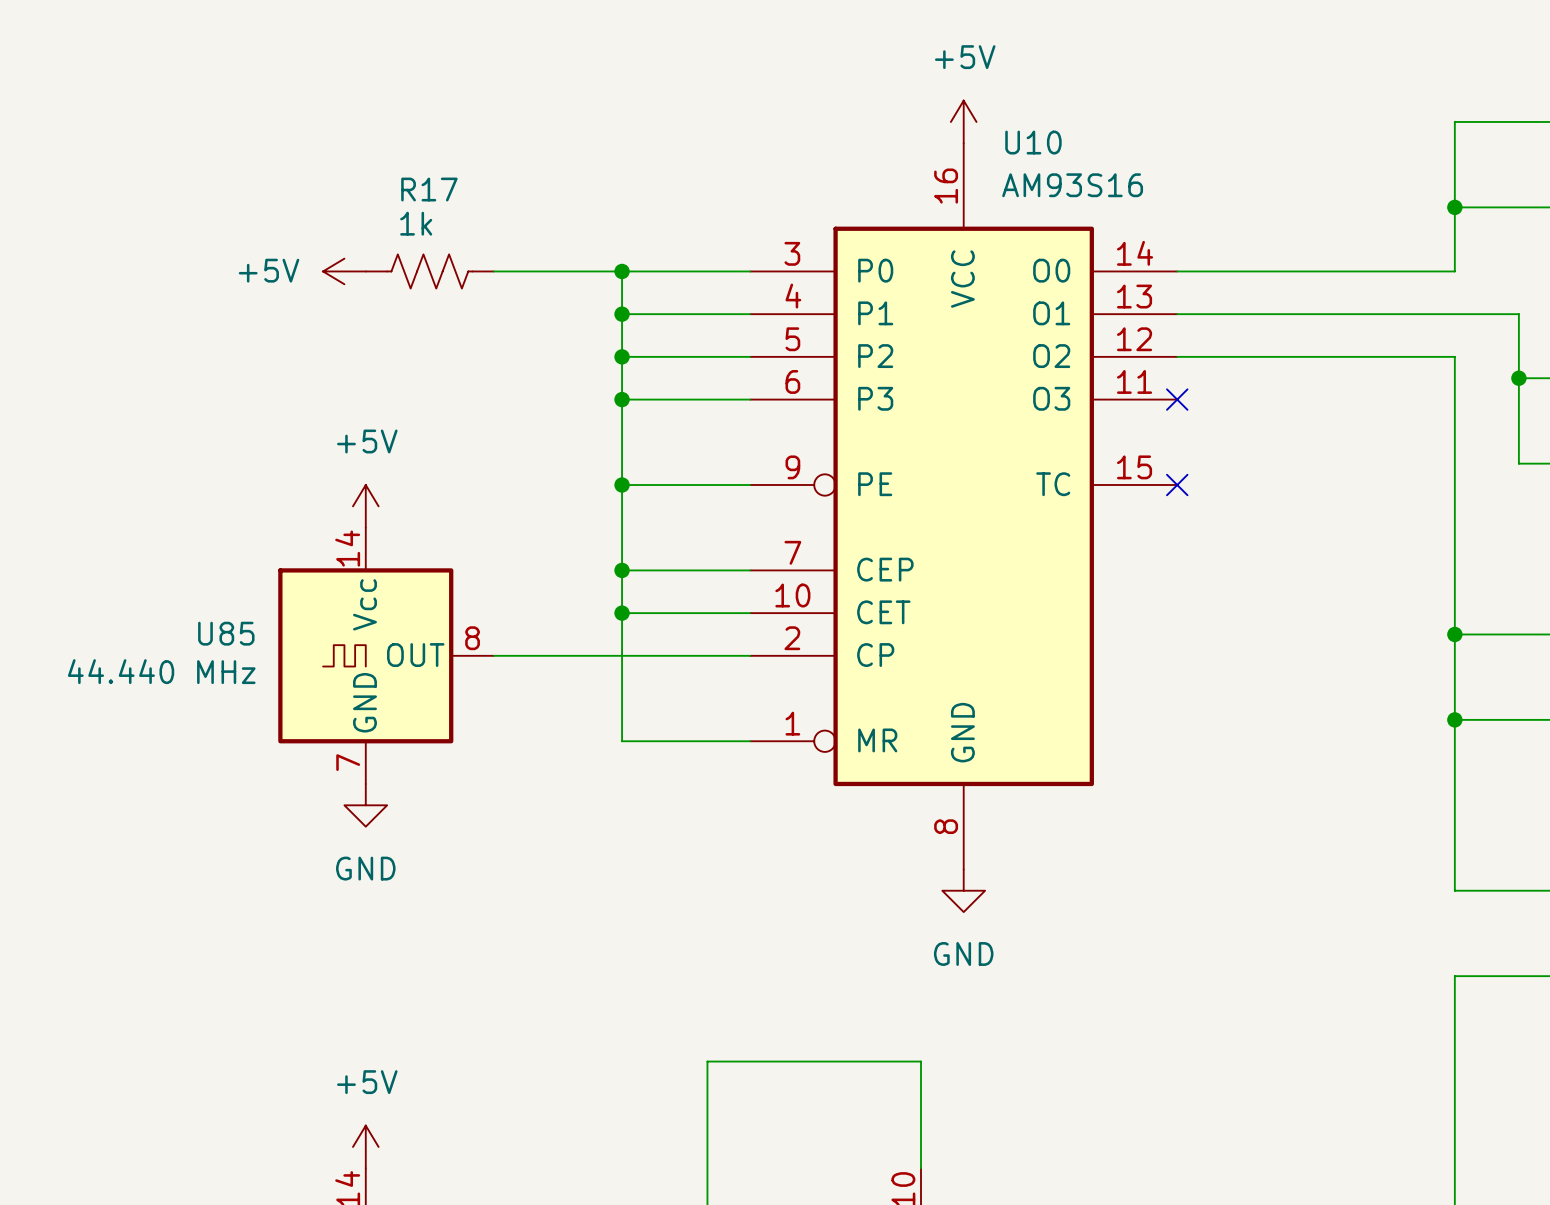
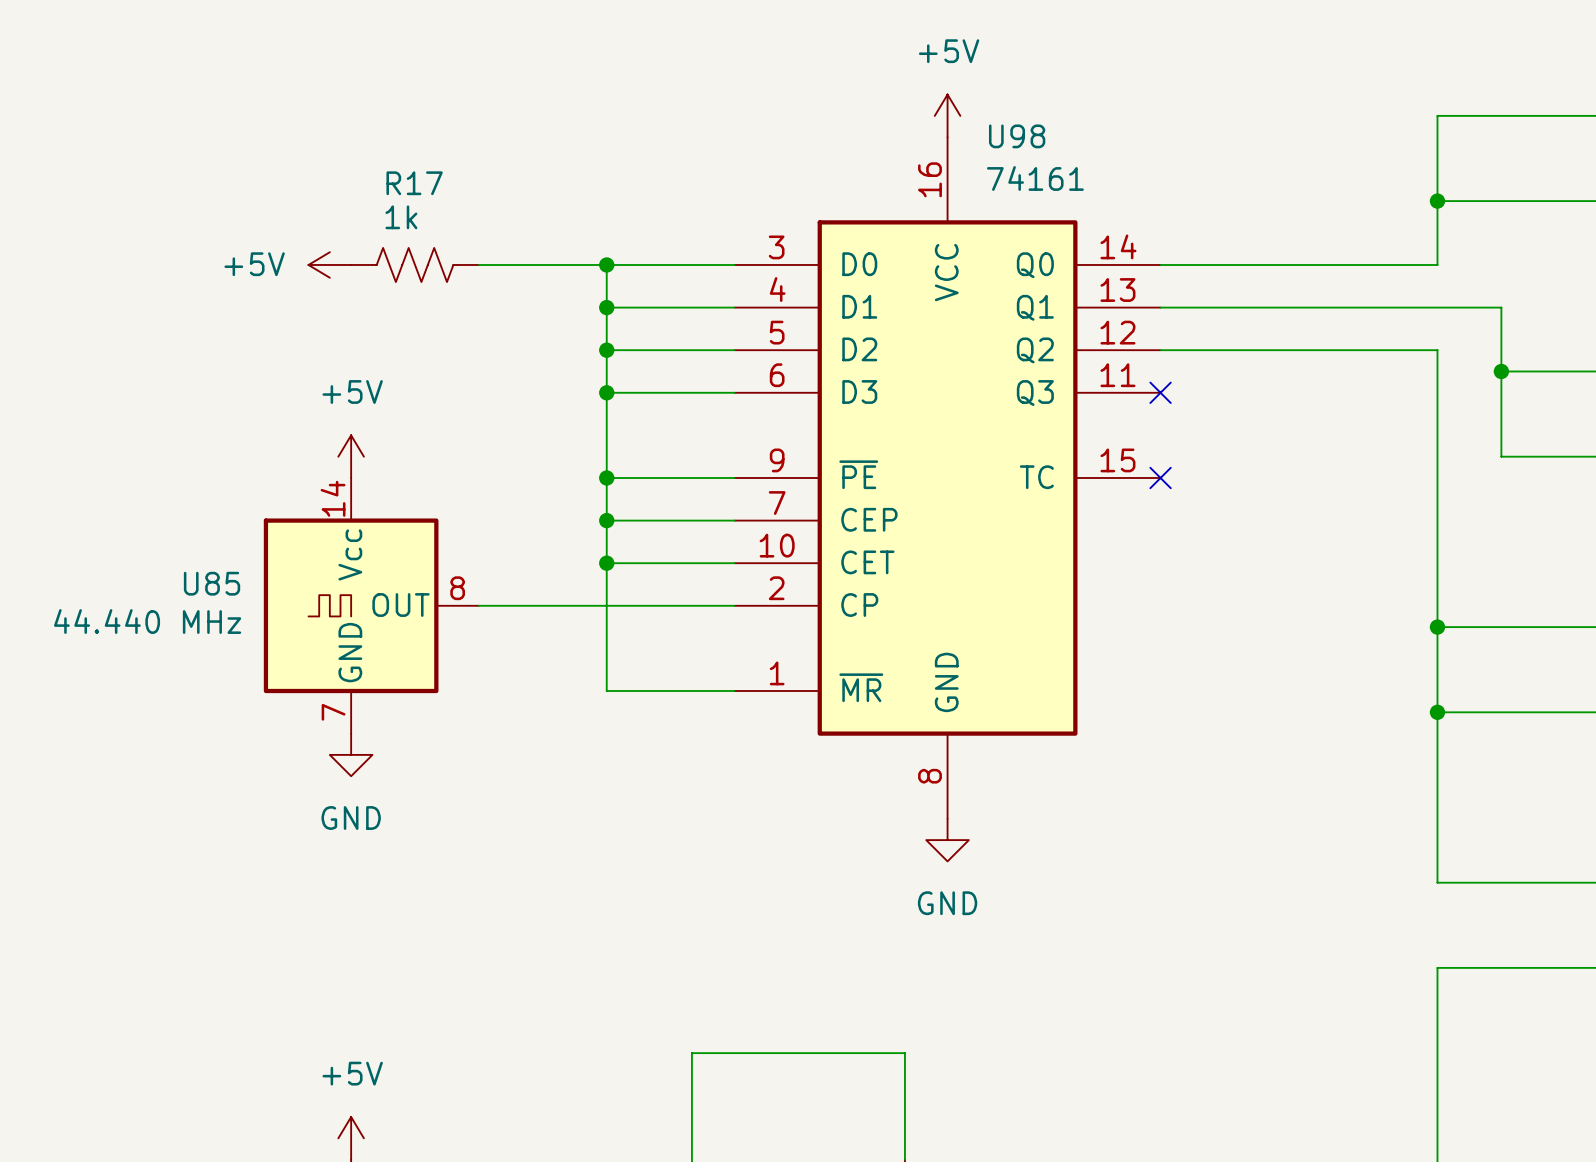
U98: none -> 74161 (947, 477)
power symbol position: +5V (365, 506) -> +5V (351, 456)
U10: AM93S16 (963, 506) -> none
wire: none -> (606, 520) (734, 520)
wire: none -> (478, 605) (606, 605)
junction position: (622, 613) -> (606, 520)
U85 position: (386, 655) -> (371, 605)
wire: (493, 655) (750, 655) -> none
wire: (622, 698) (622, 741) (750, 741) -> (606, 691) (734, 691)
power symbol position: GND (365, 805) -> GND (351, 754)
power symbol position: GND (963, 890) -> GND (947, 840)

